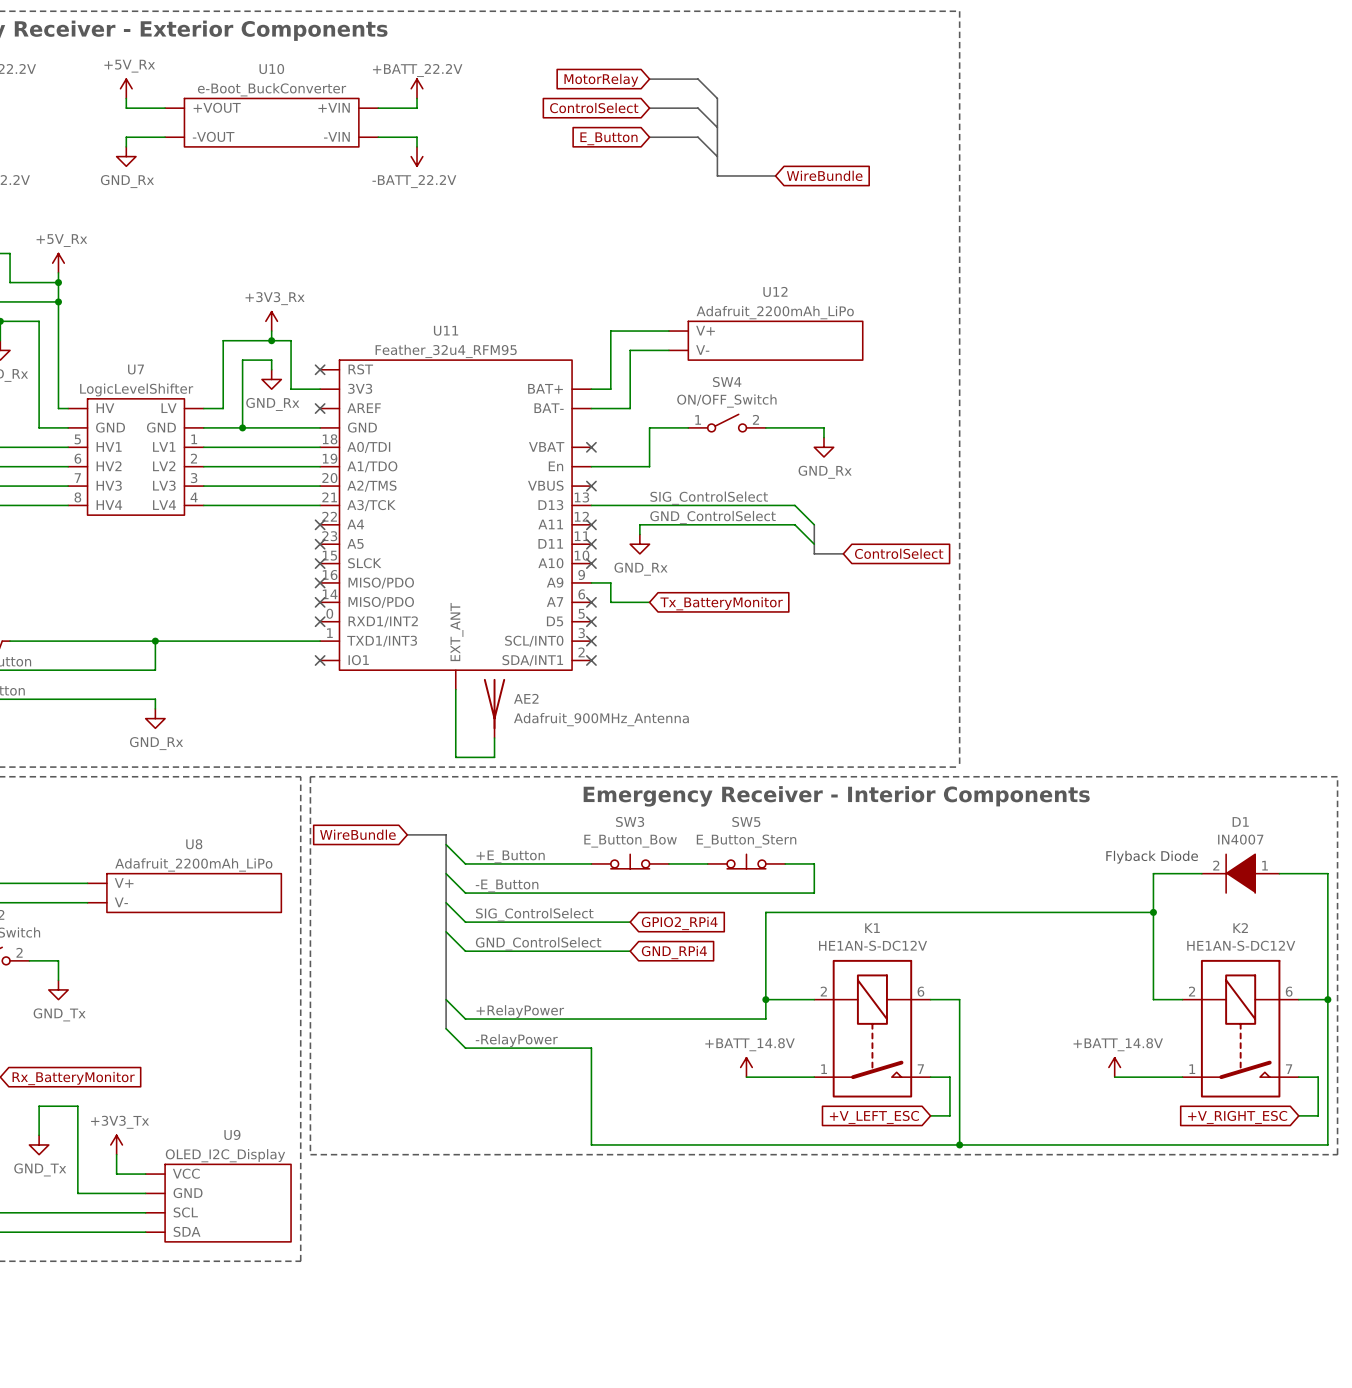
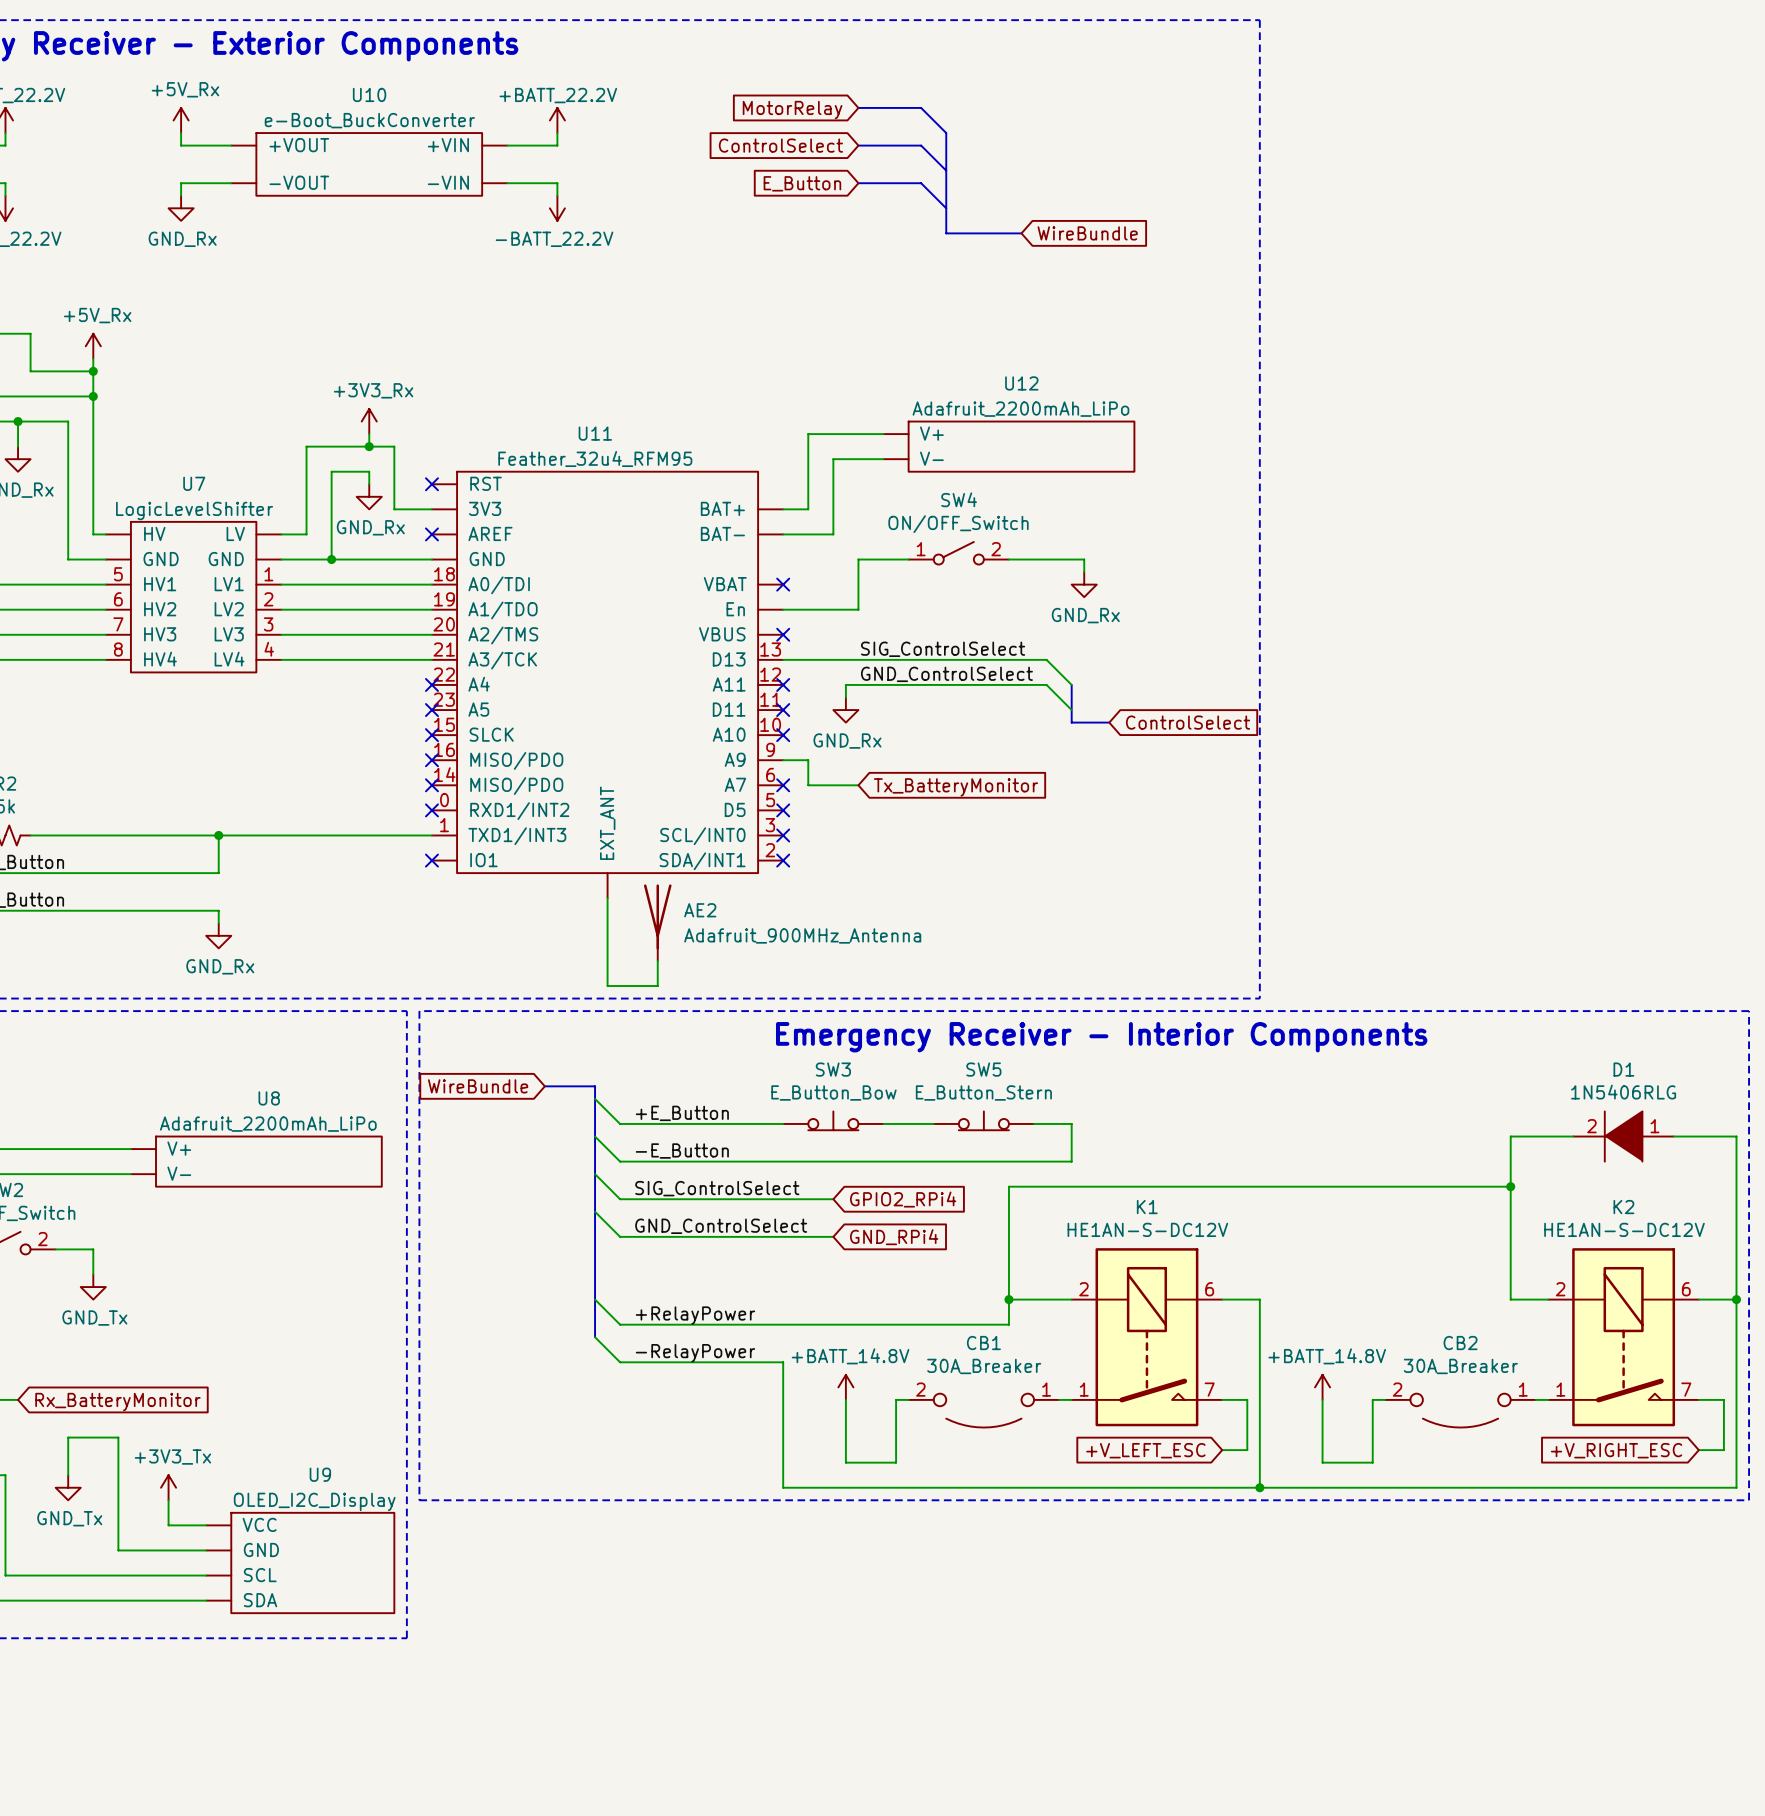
D1 value: IN4007 (1240, 839) -> 1N5406RLG (1623, 1092)
text: Flyback Diode (1152, 857) -> none
power symbol position: +BATT_14.8V (746, 1067) -> +BATT_14.8V (845, 1387)
power symbol position: +BATT_14.8V (1114, 1067) -> +BATT_14.8V (1322, 1387)
wire: none -> (845, 1399) (845, 1462) (896, 1462) (896, 1399) (908, 1399)
wire: (746, 1077) (804, 1077) -> none
wire: none -> (1322, 1399) (1322, 1462) (1372, 1462) (1372, 1399) (1385, 1399)
wire: (1114, 1077) (1172, 1077) -> none
CB1: none -> 30A_Breaker (983, 1410)
CB2: none -> 30A_Breaker (1460, 1410)

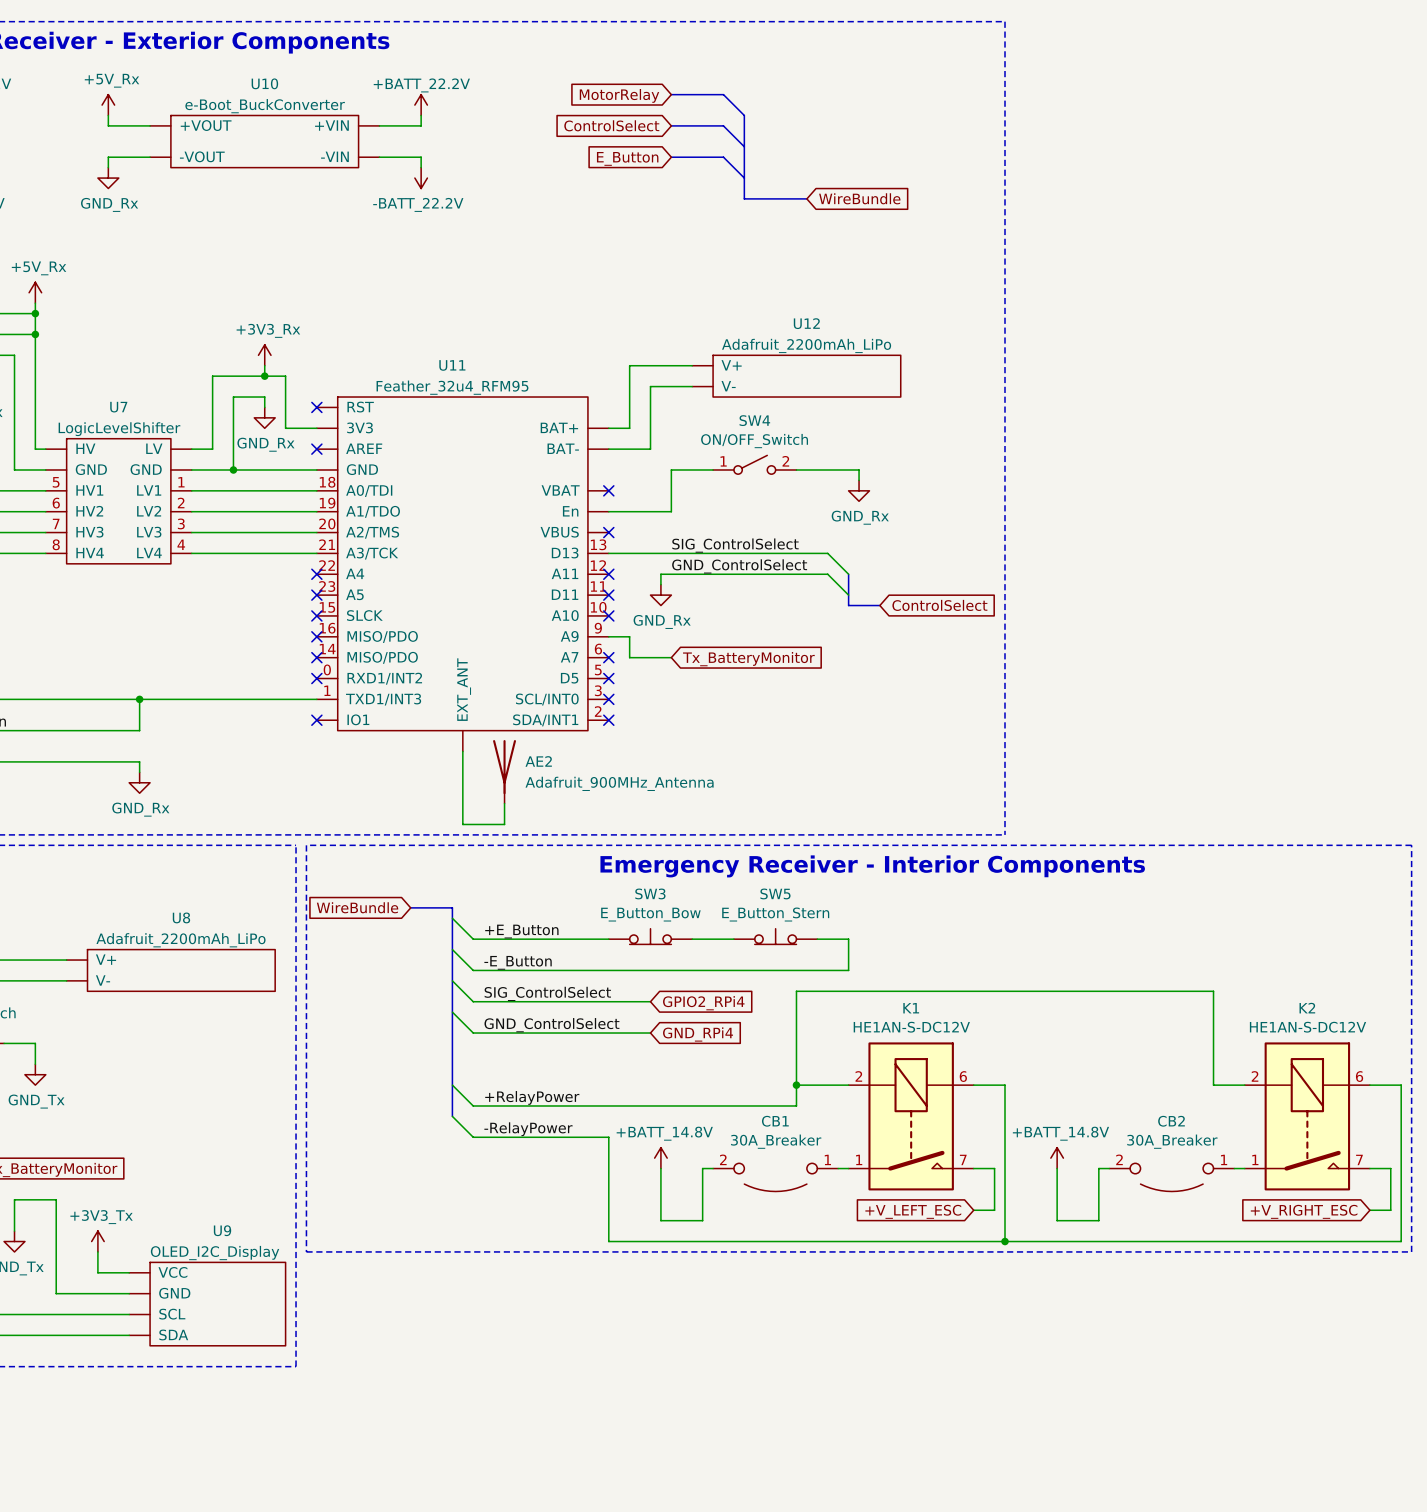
wire: (1573, 1136) (1510, 1136) (1510, 1186) -> none
D1: 1N5406RLG (1623, 1136) -> none
wire: (1673, 1136) (1736, 1136) (1736, 1299) -> none
junction: (1510, 1186) -> none
junction: (1736, 1299) -> none

